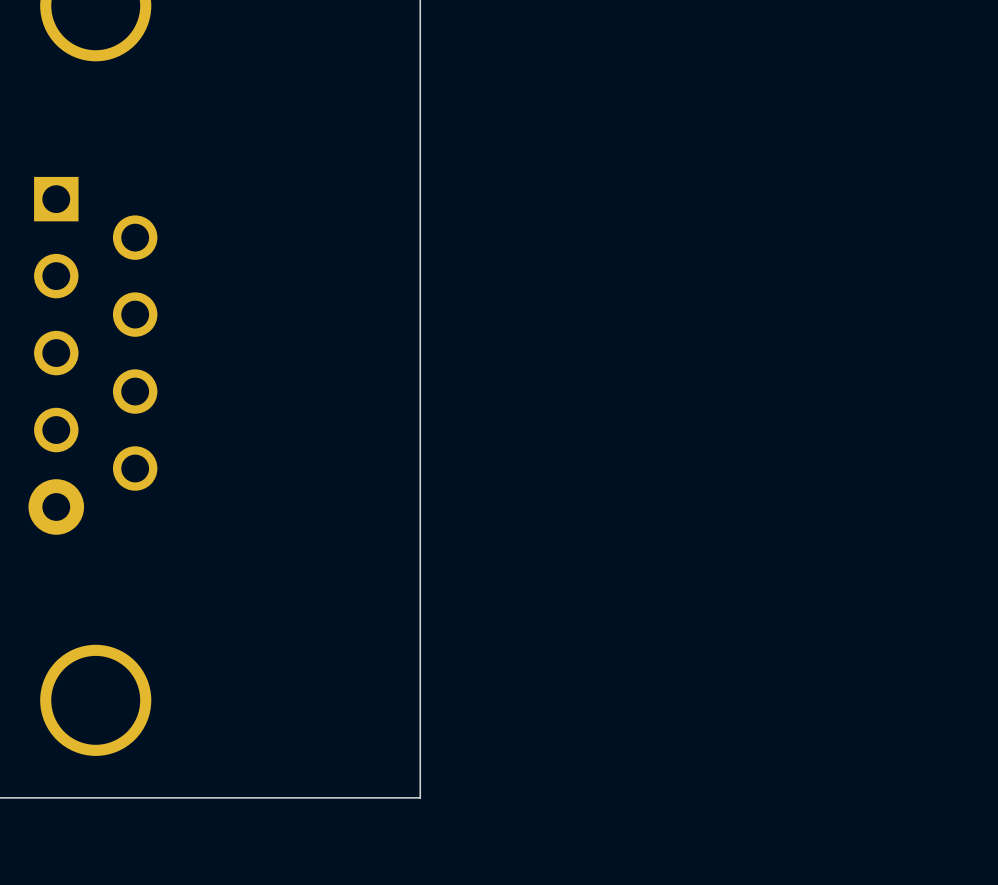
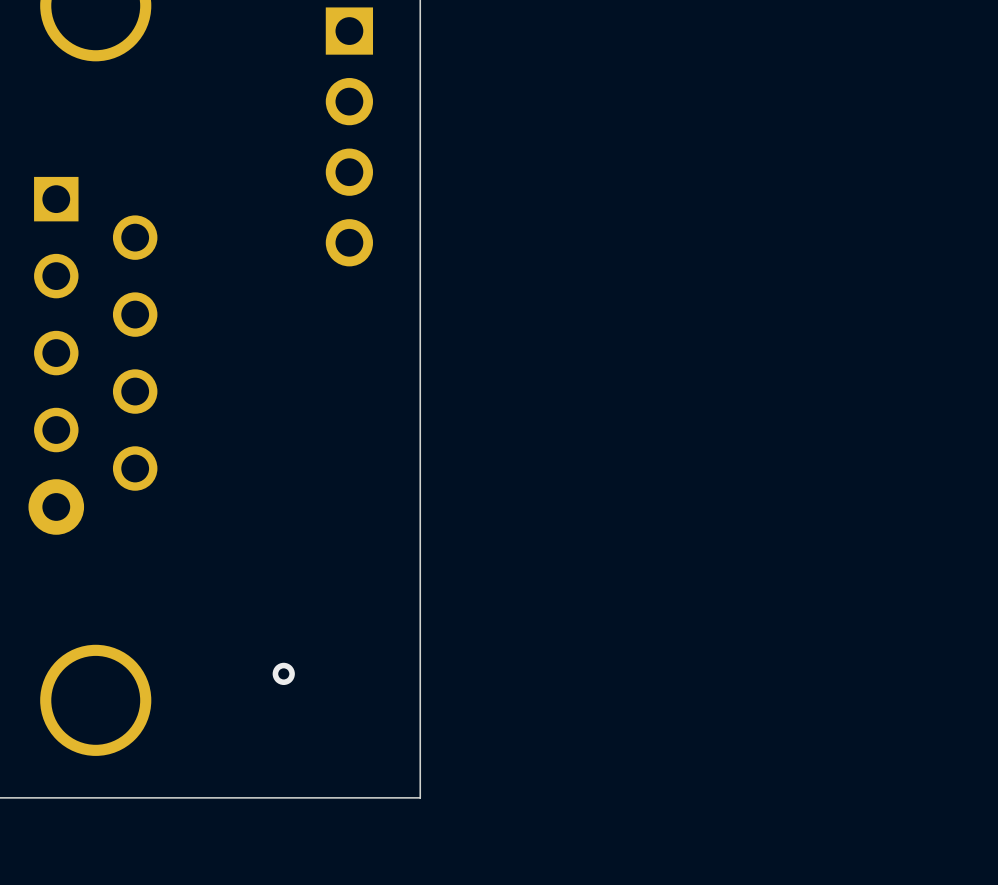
part: none -> (349, 136)
via: none -> (283, 673)

